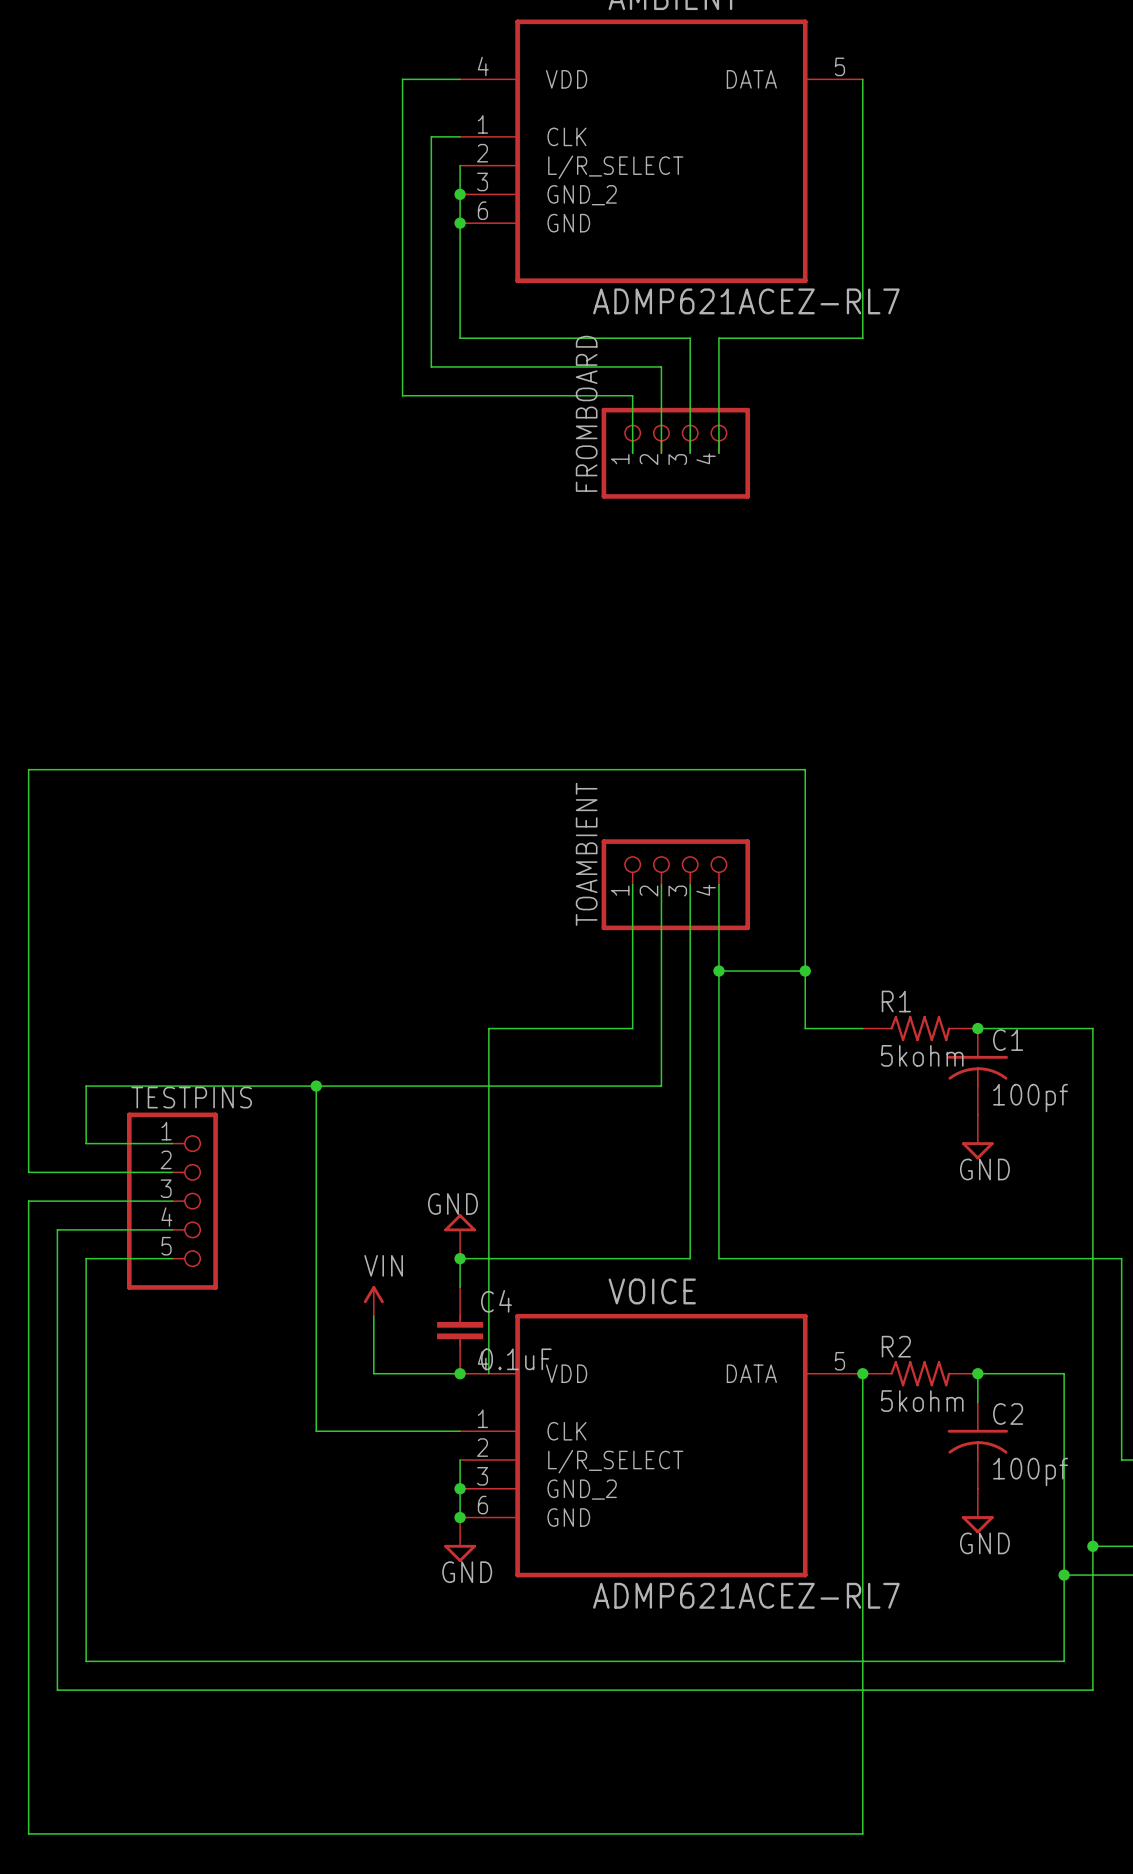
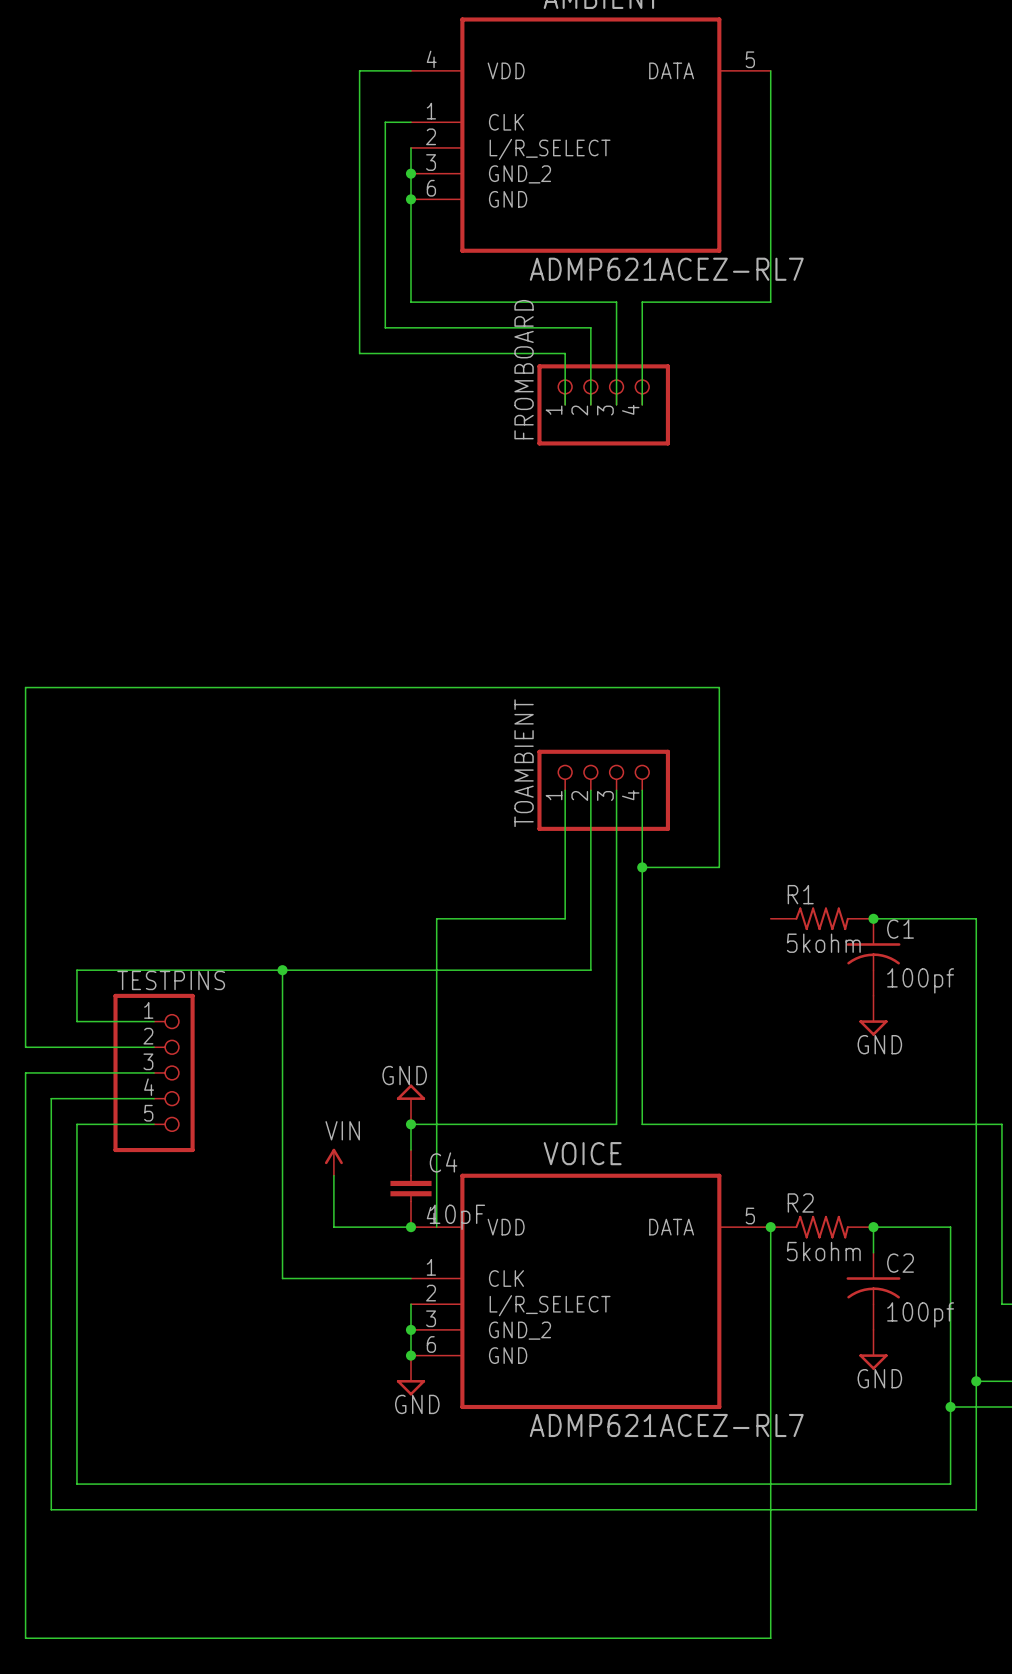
wire: (805, 971) (805, 1028) (862, 1028) -> none
junction: (805, 971) -> none
C4 value: 0.1uF (516, 1359) -> 10pF (457, 1217)

